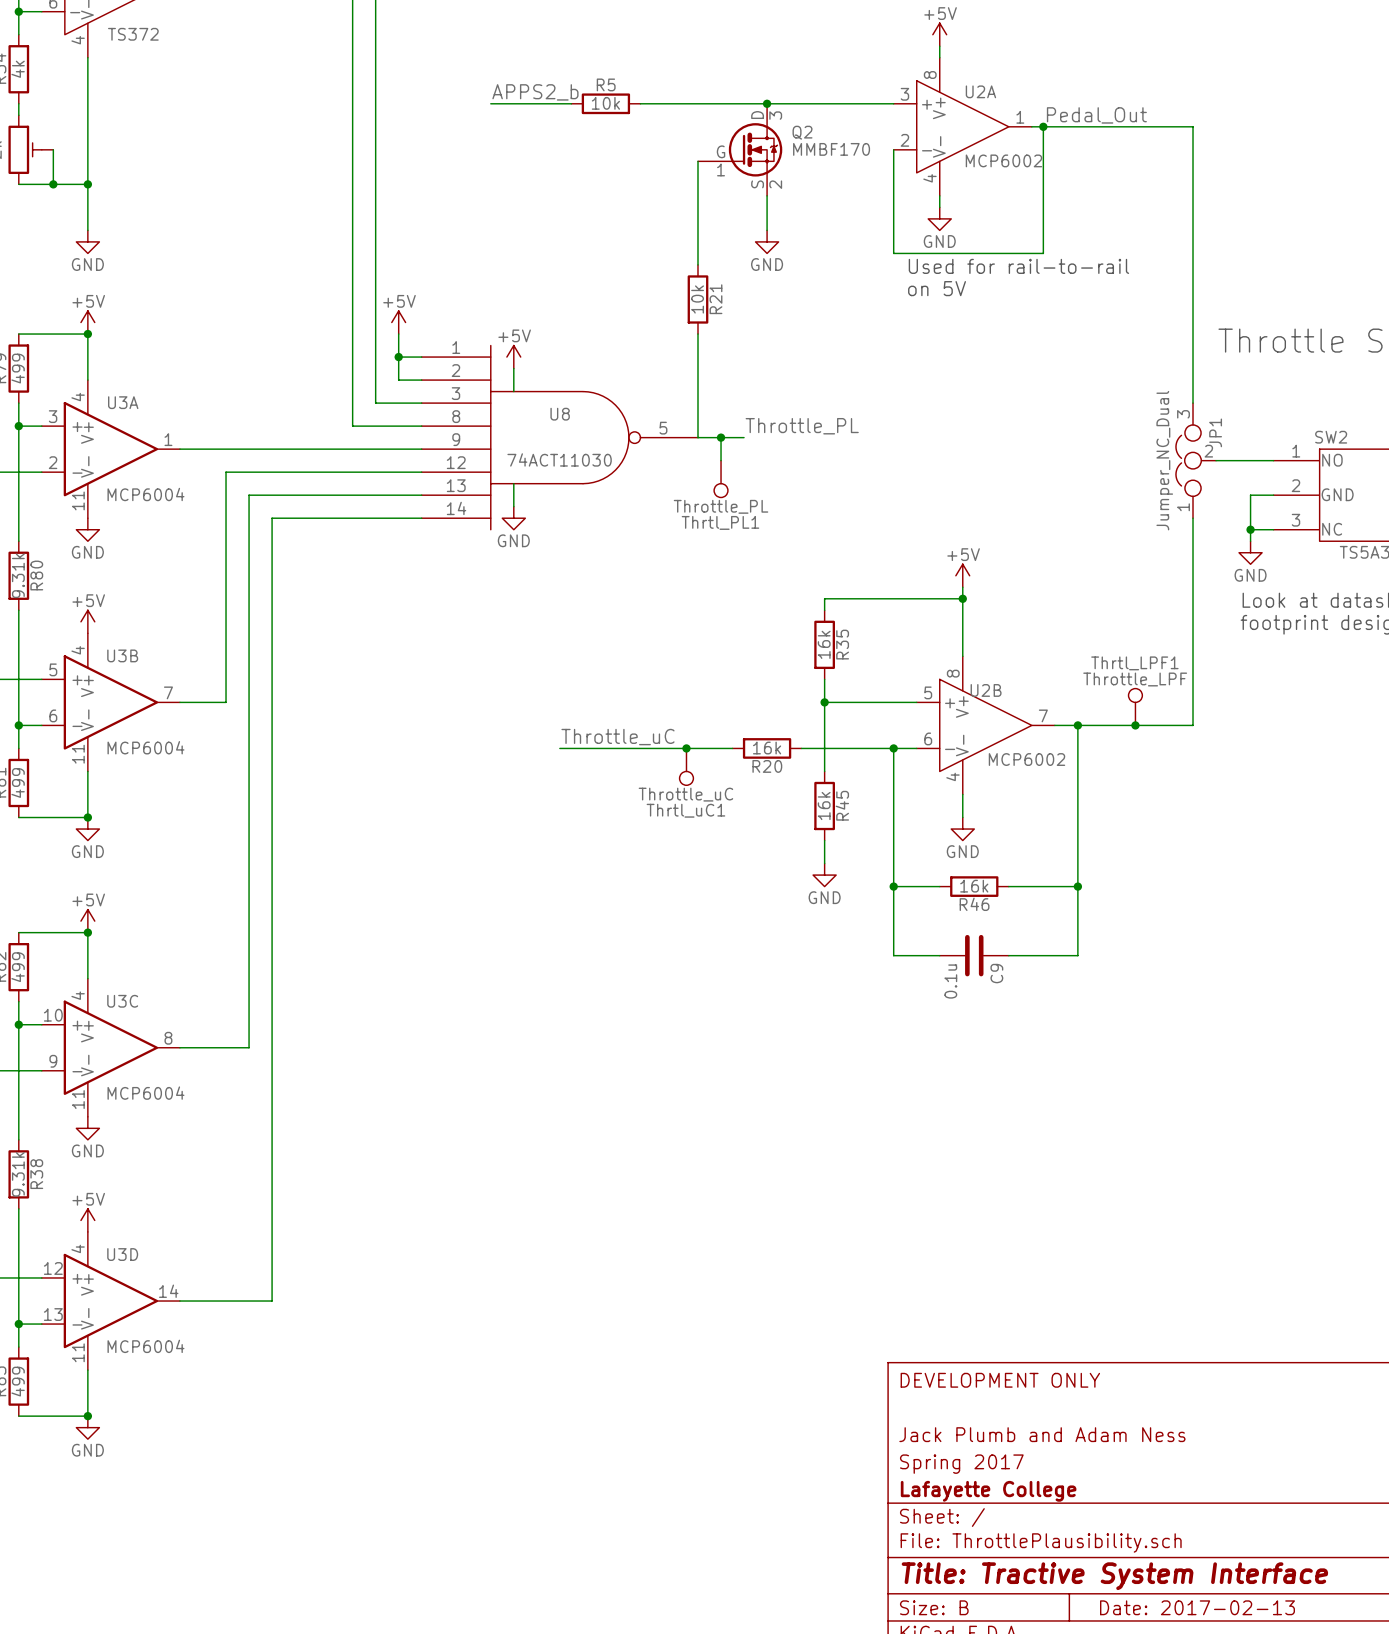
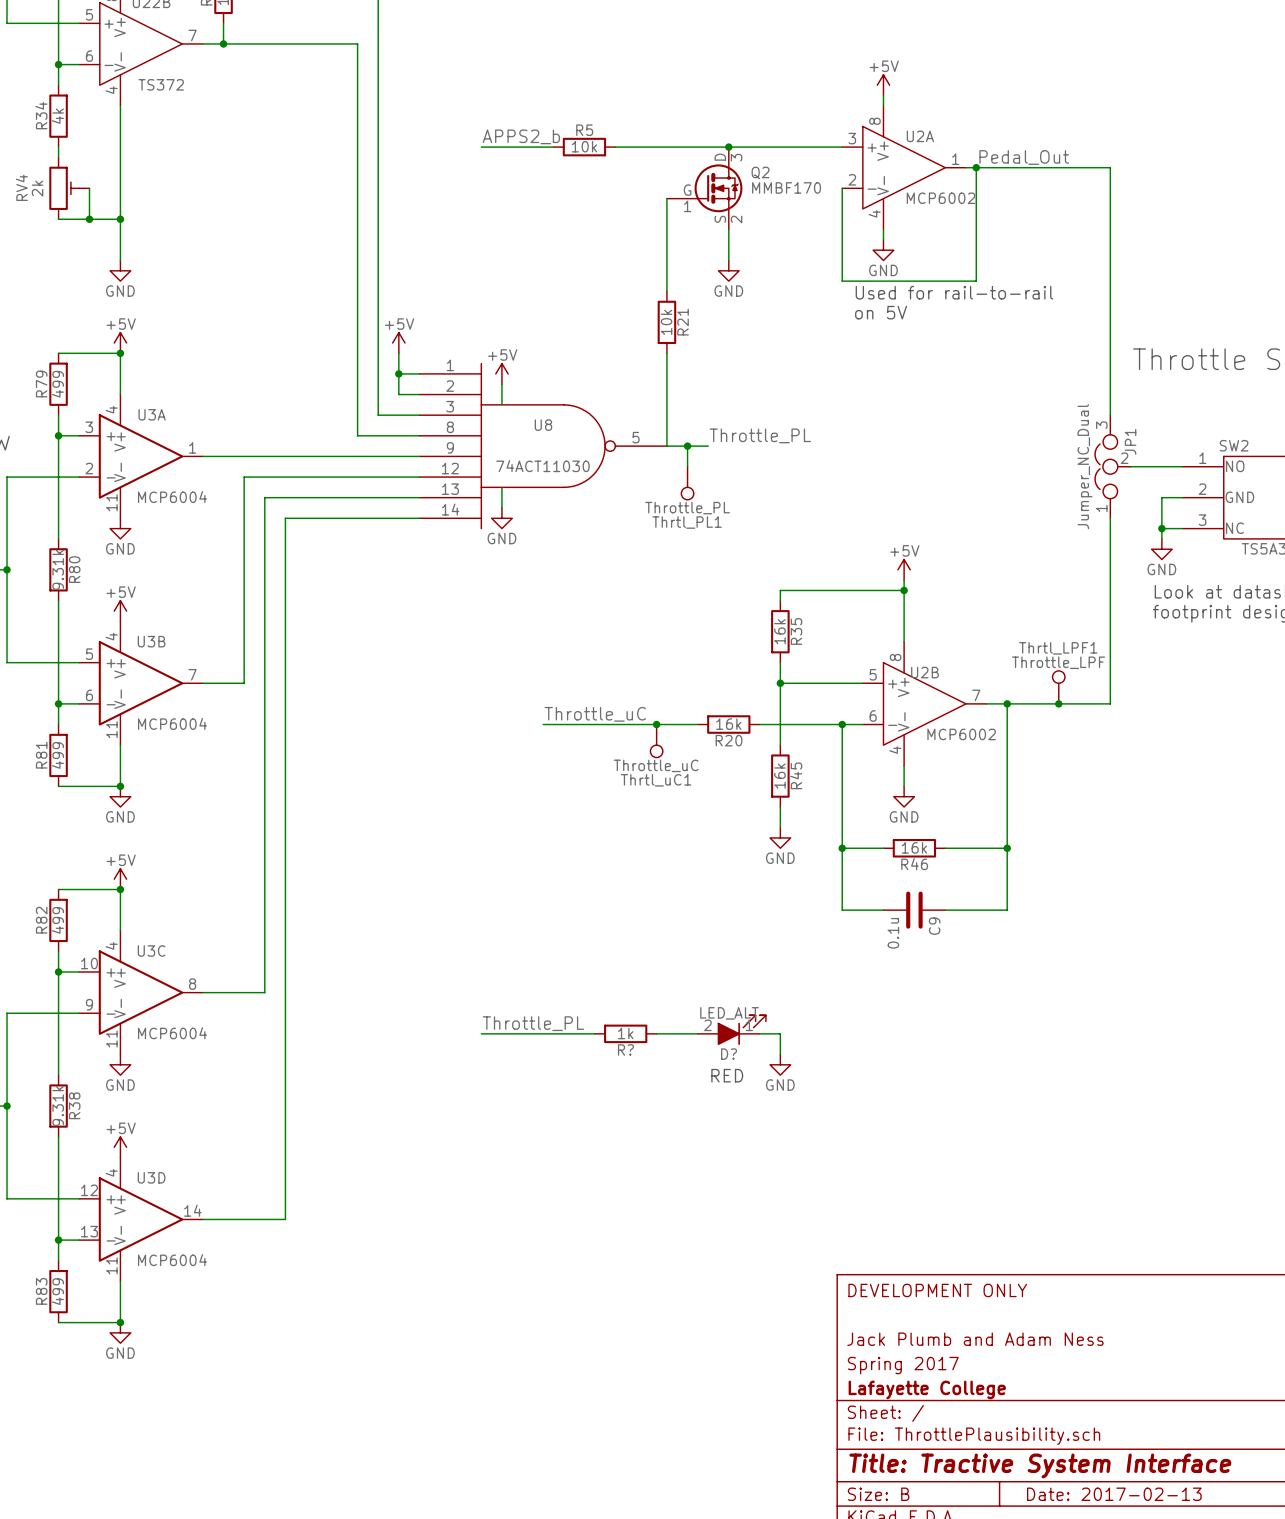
label: none -> Throttle_PL (533, 1023)
D?: none -> LED_ALT (731, 1030)
wire: none -> (481, 1033) (594, 1033)
R?: none -> 1k (625, 1033)
wire: none -> (656, 1033) (697, 1033)
wire: none -> (759, 1033) (780, 1033) (780, 1054)
power symbol: none -> GND (780, 1064)
text: none -> RED (727, 1075)

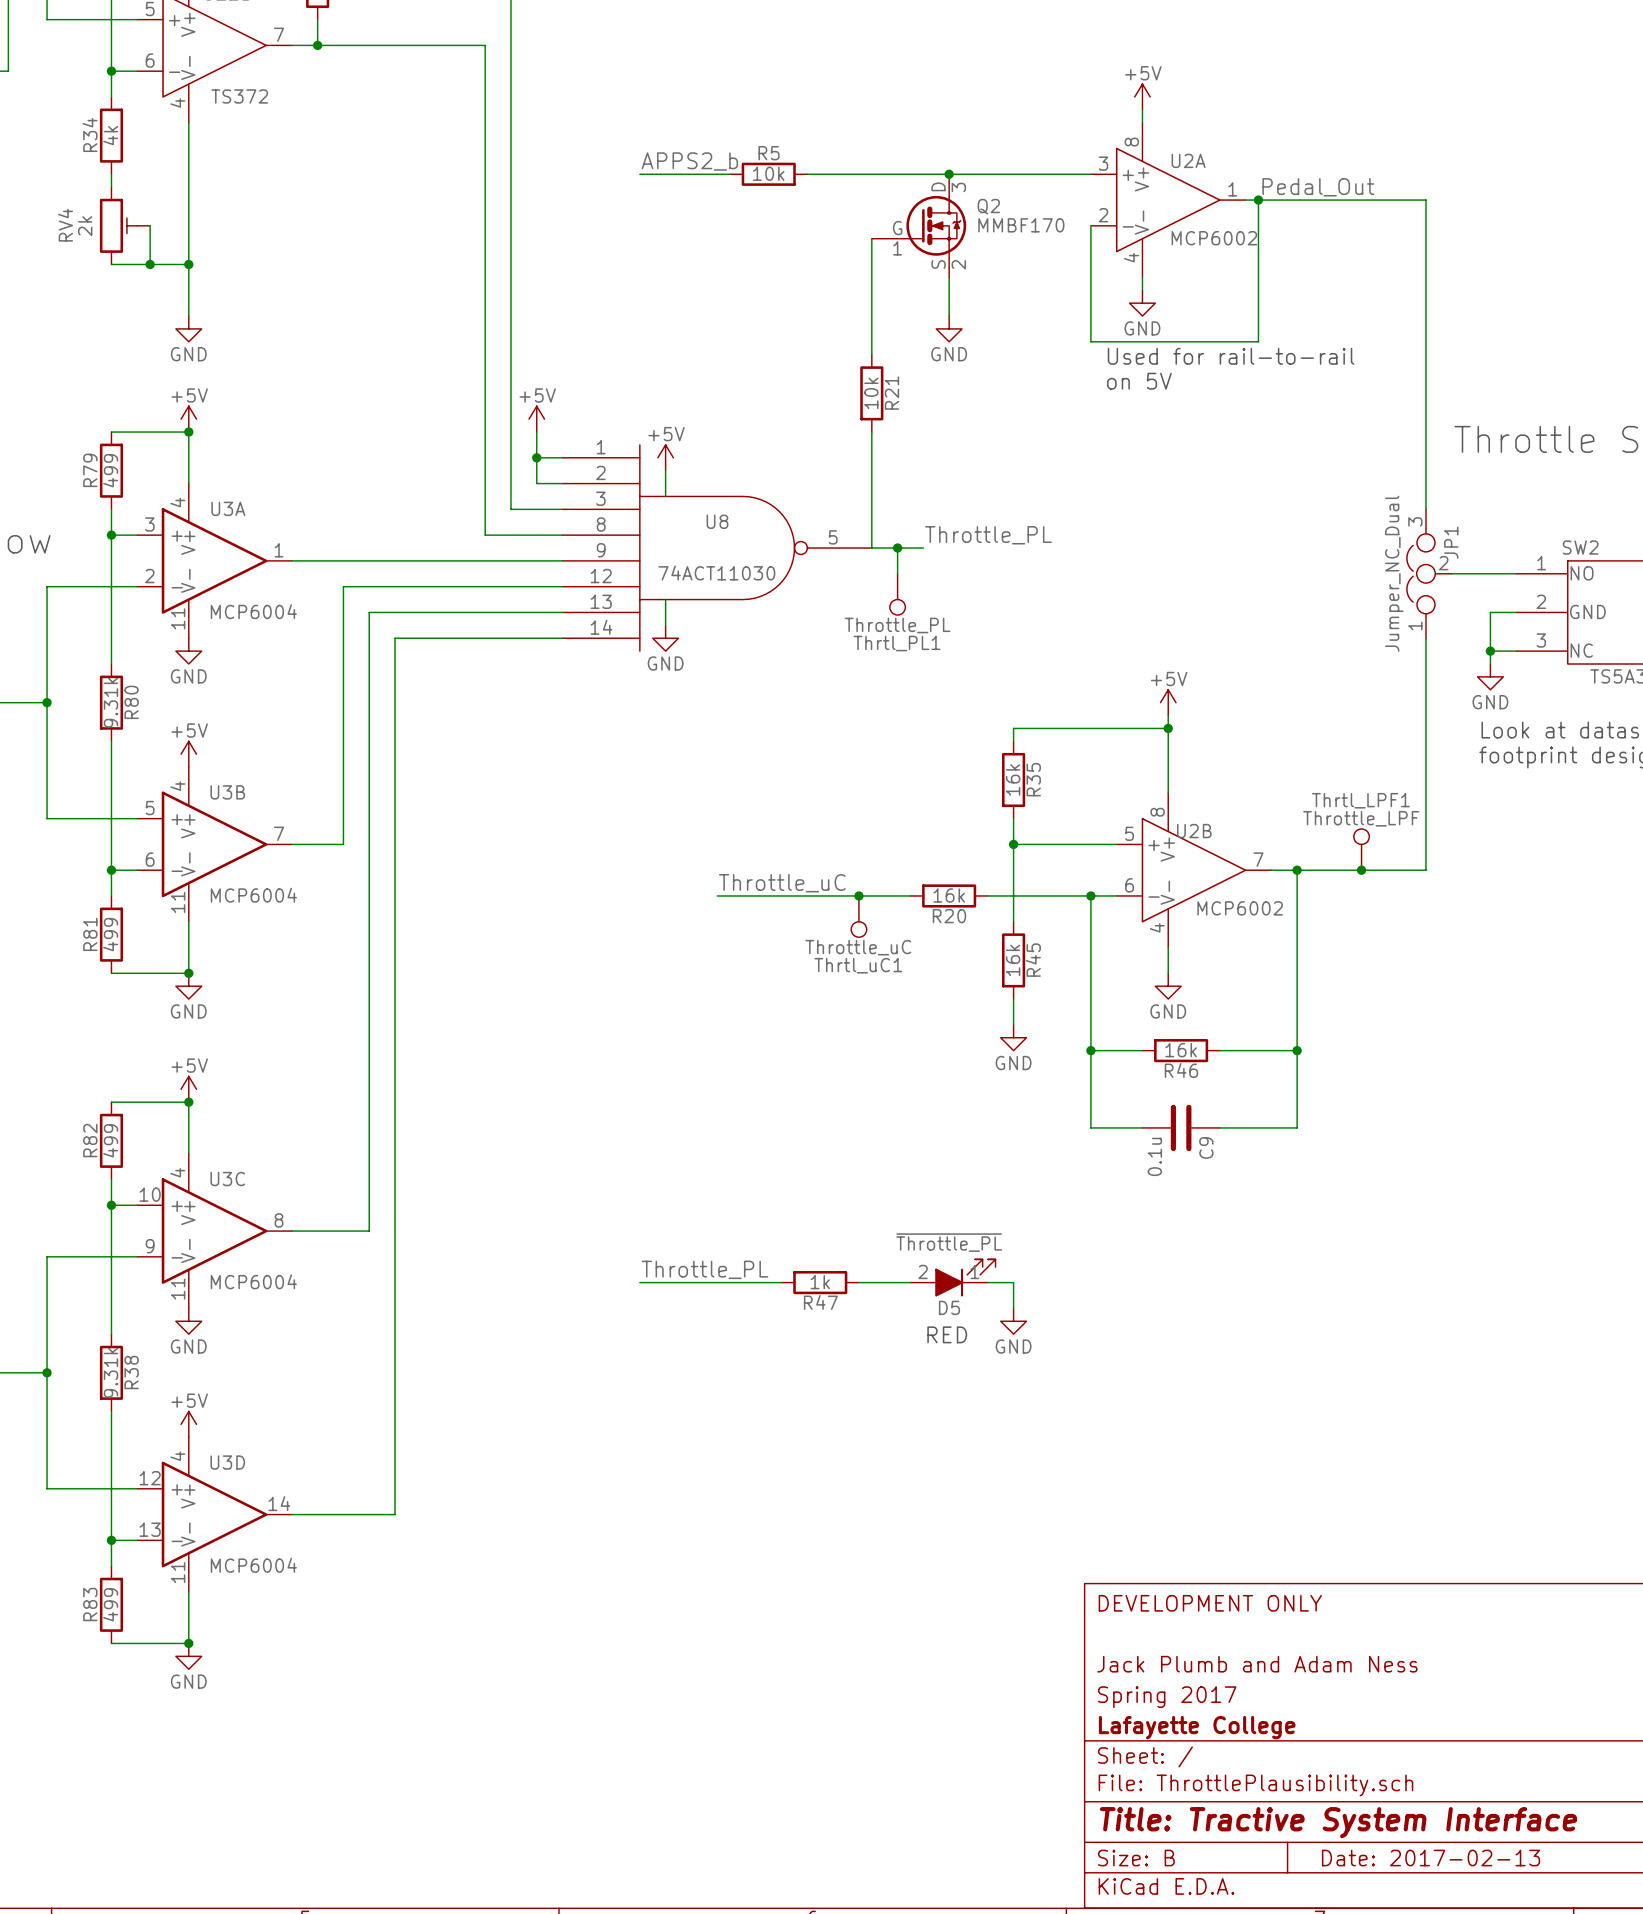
D? value: LED_ALT (729, 1013) -> ~{Throttle_PL} (949, 1242)
R? name: R? (625, 1049) -> R47 (820, 1302)
D? name: D? (729, 1054) -> D5 (949, 1307)

